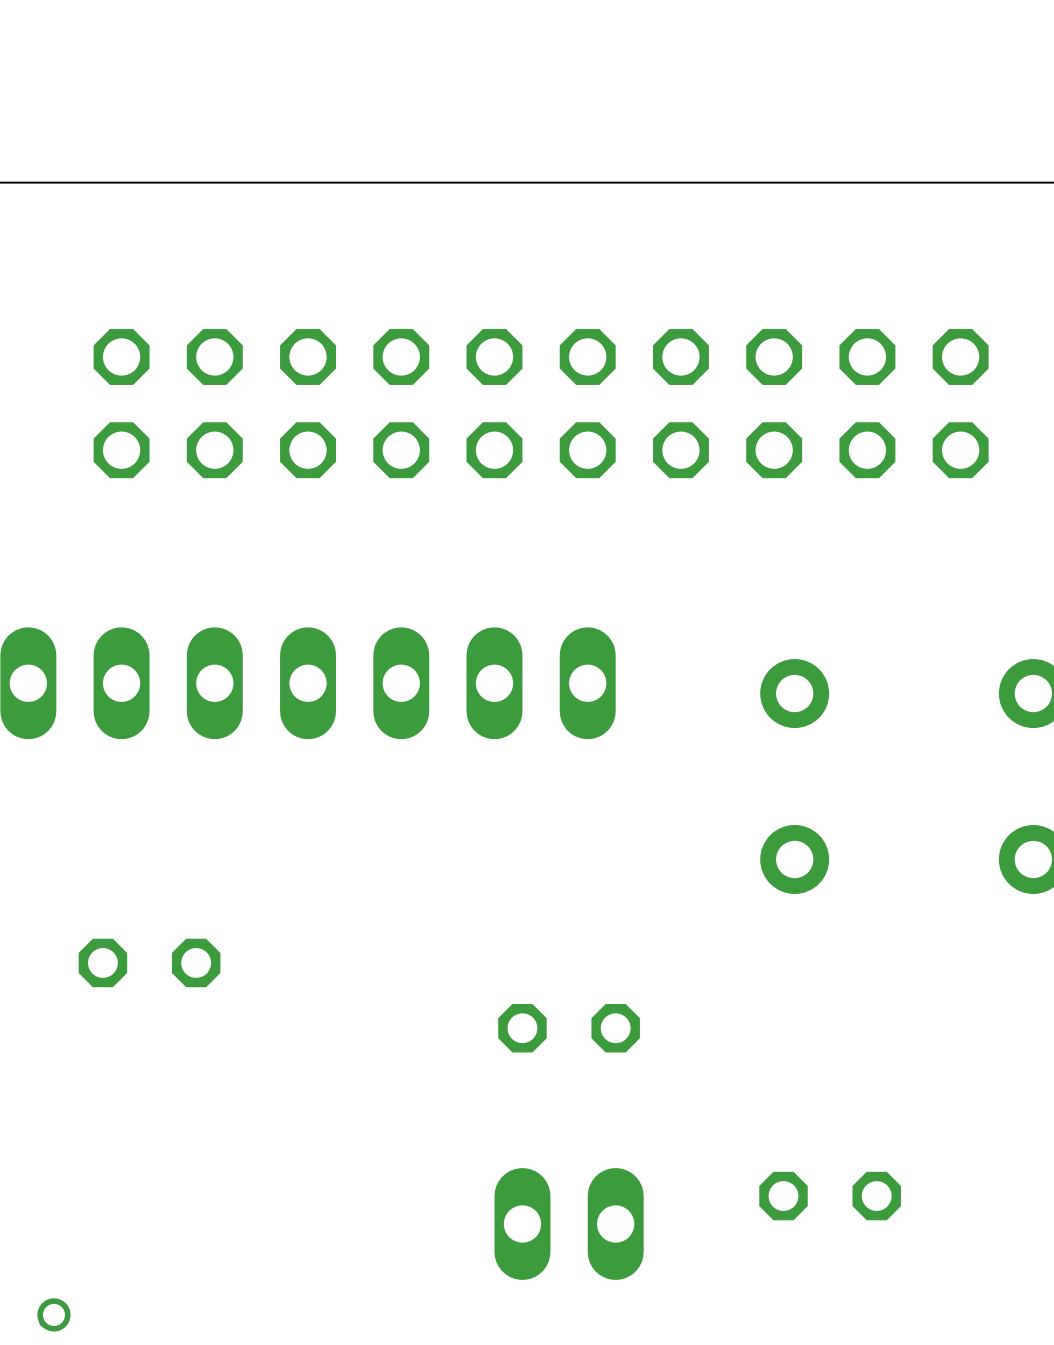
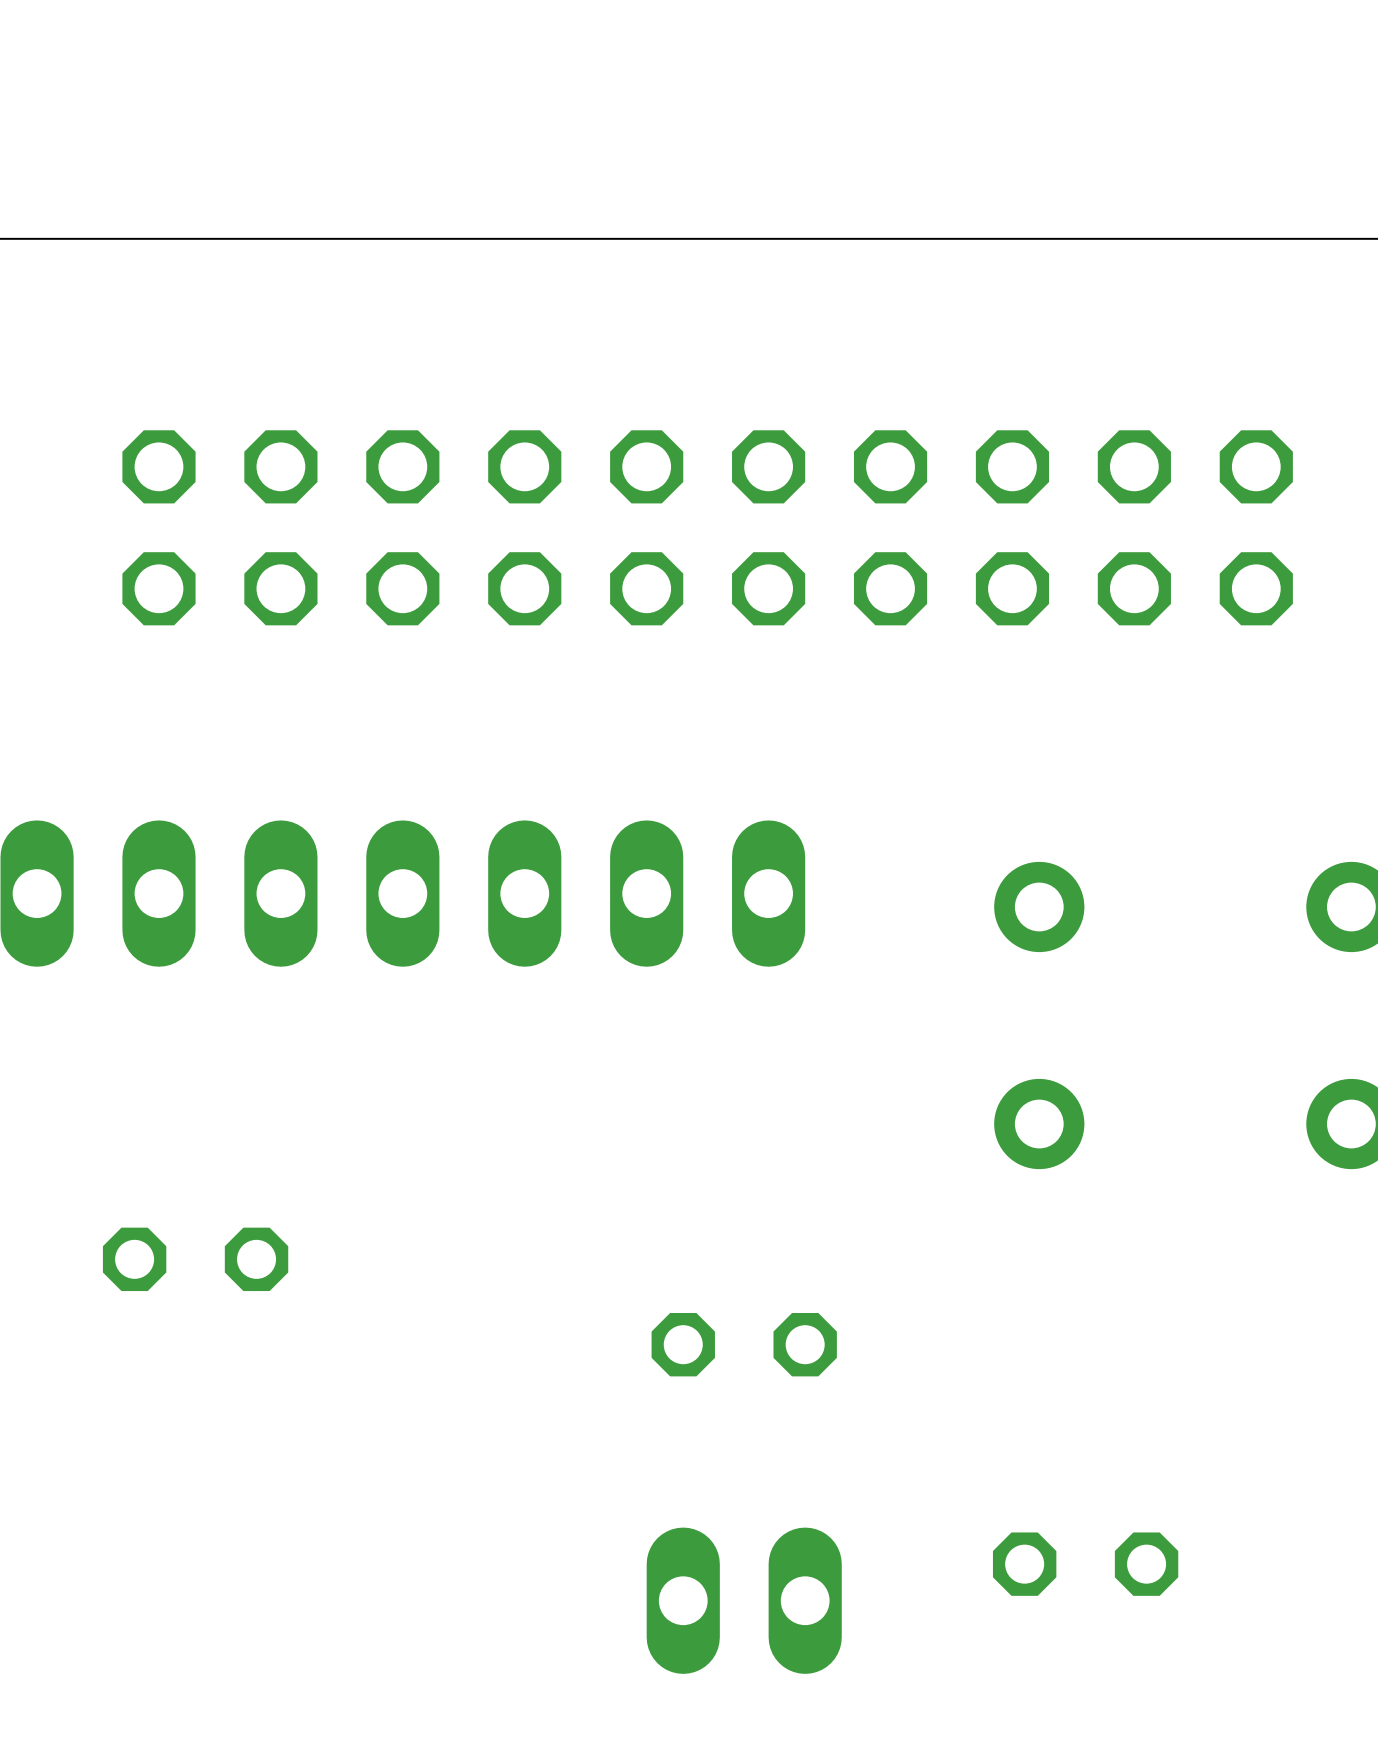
via: (53, 1314) -> none

